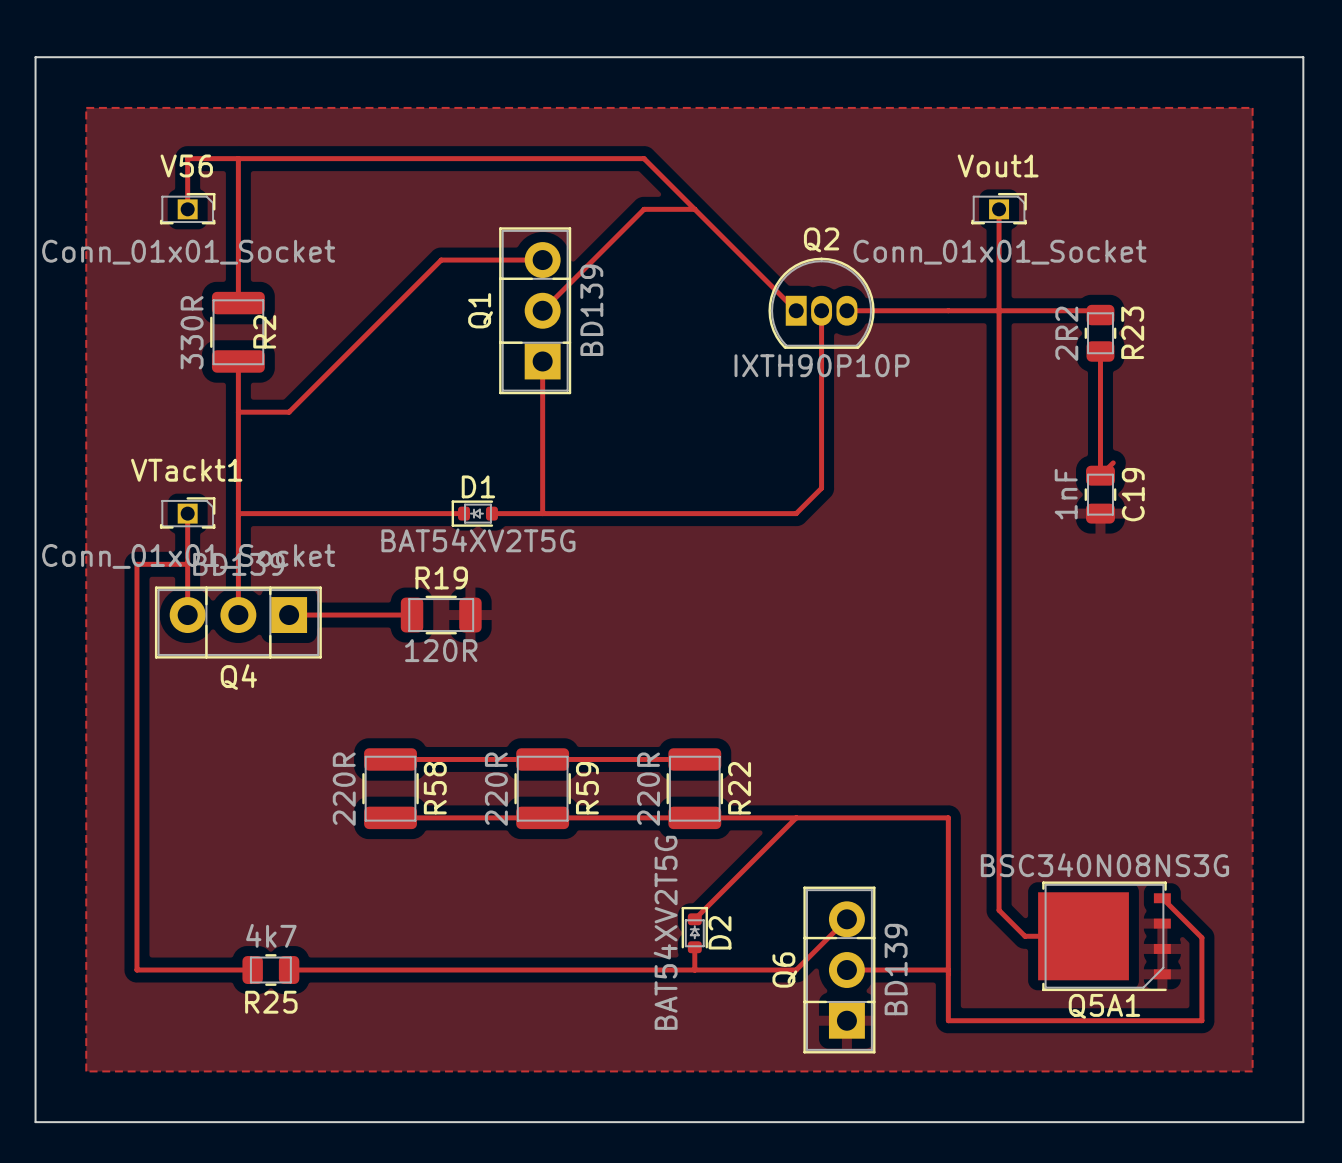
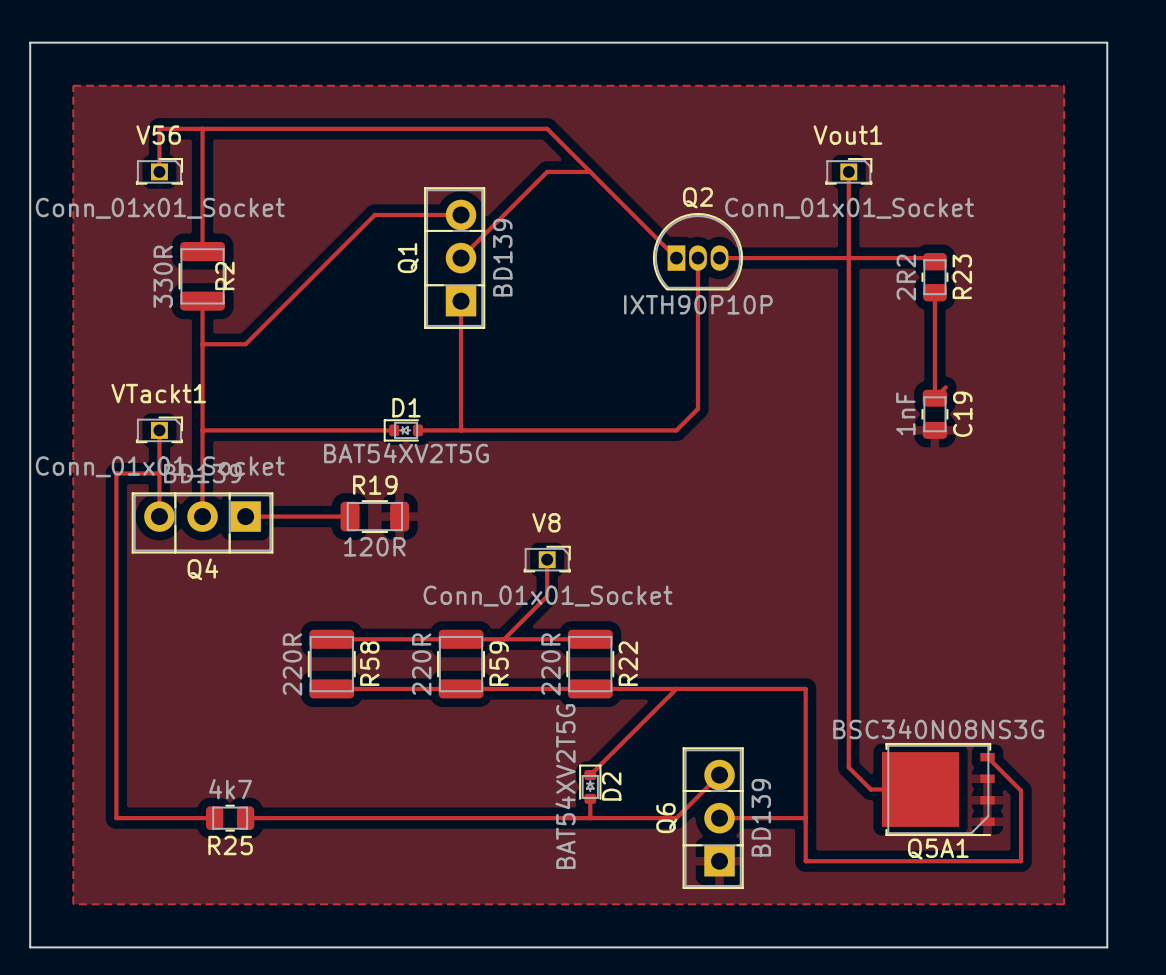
track: none -> (547, 559) (547, 596) (504, 639)
V8: none -> Conn_01x01_Socket (547, 559)

